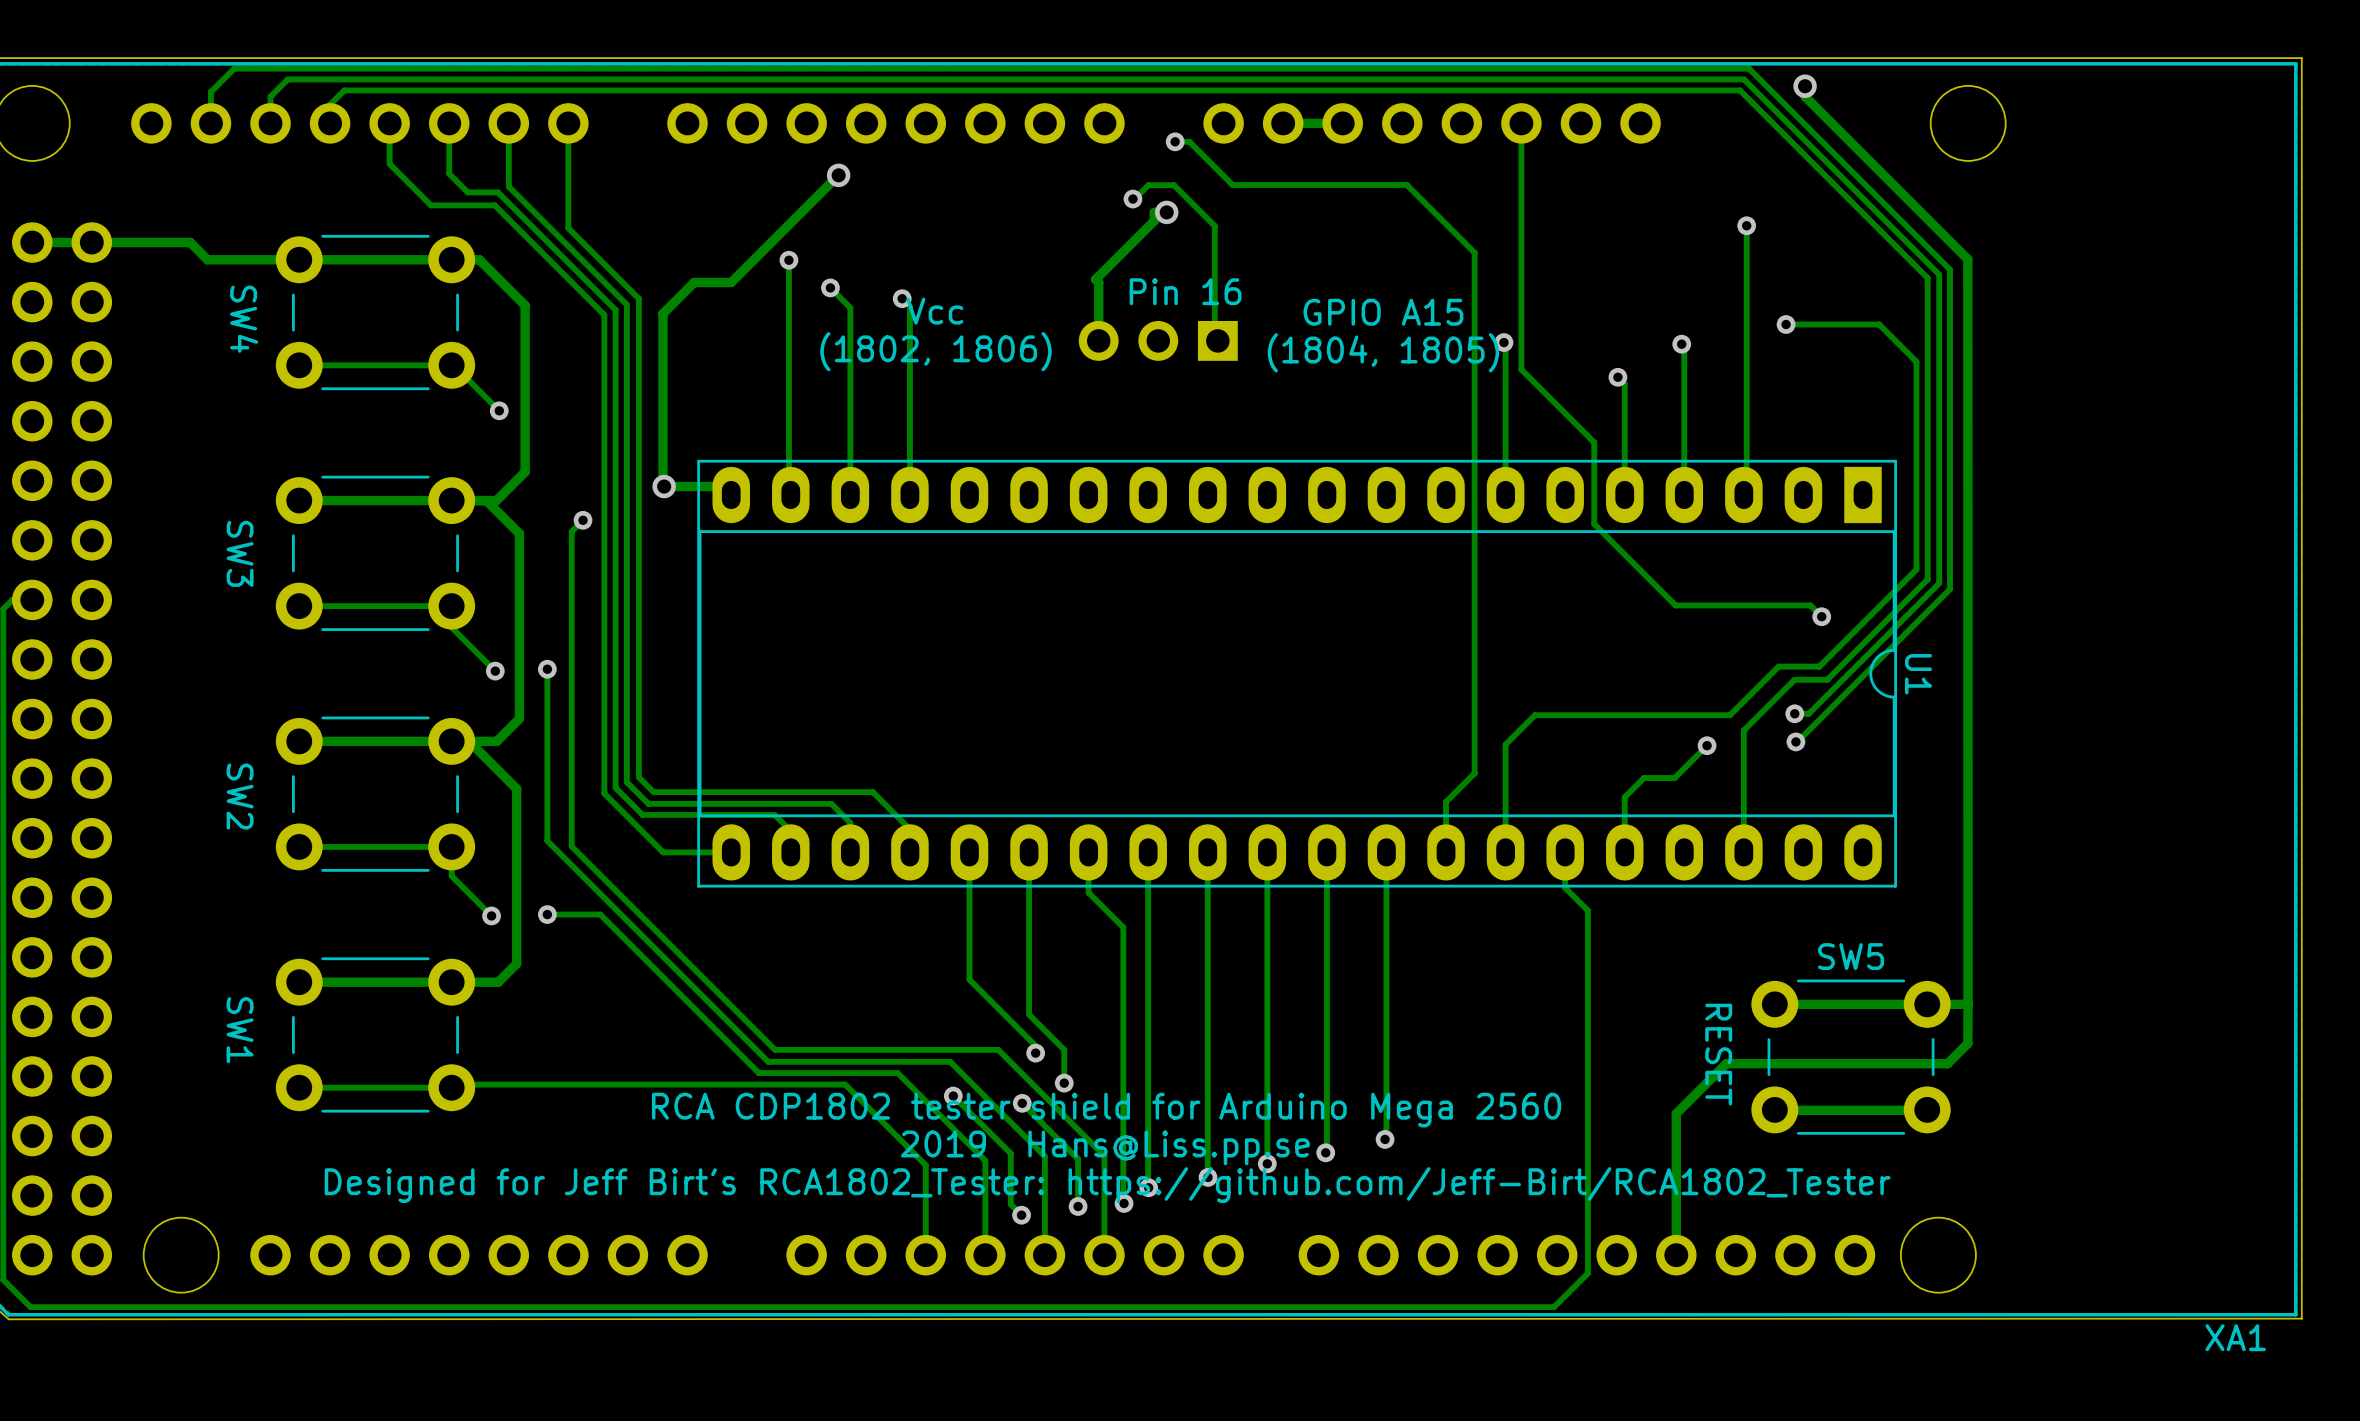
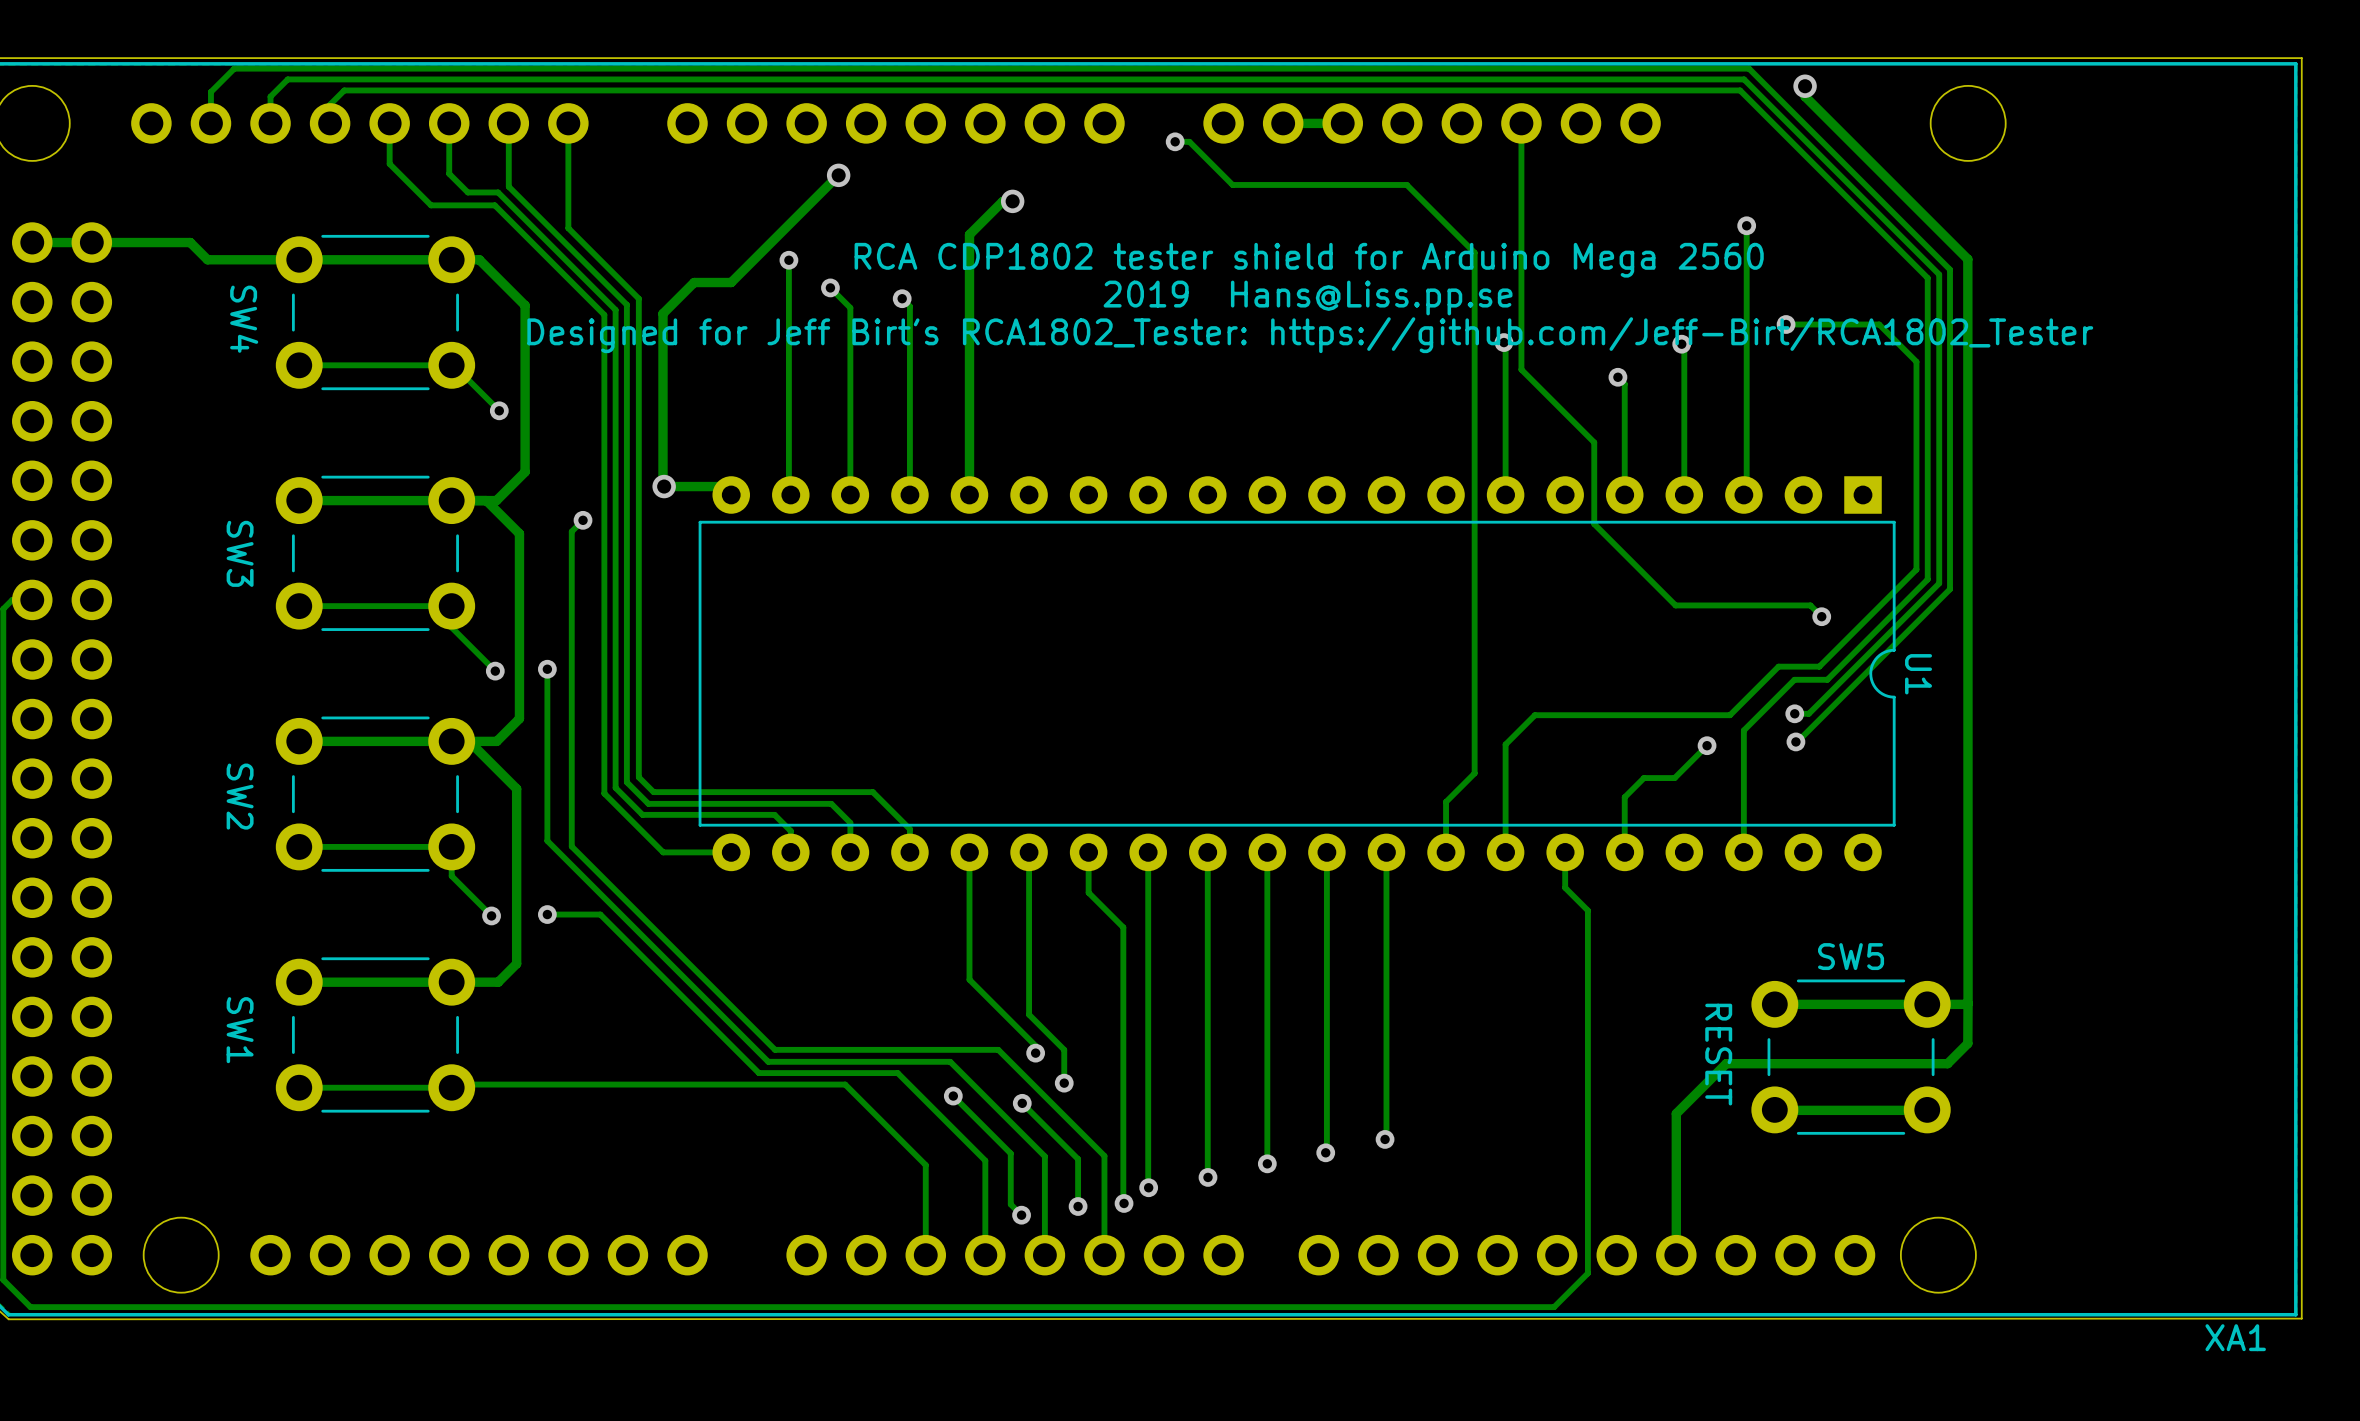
track: (1132, 199) (1148, 185) (1174, 185) (1214, 226) (1214, 337) (1217, 340) -> none
via: (1132, 199) -> none
track: none -> (1012, 201) (1002, 201) (969, 234) (969, 494)
via: none -> (1012, 201)
track: (1166, 212) (1154, 212) (1154, 220) (1095, 279) (1098, 282) (1098, 340) -> none
via: (1166, 212) -> none
text: none -> RCA CDP1802 tester shield for Arduino Mega 2560 (1309, 260)
text: Pin 16 (1185, 291) -> none
text: none -> 2019 Hans@Liss.pp.se (1308, 297)
text: Vcc (934, 311) -> none
text: GPIO A15 (1383, 312) -> none
text: none -> Designed for Jeff Birt's RCA1802_Tester: https://github.com/Jeff-Birt/RCA1802_Tester (1310, 335)
part: (1158, 340) -> none
text: (1802, 1806) (935, 351) -> none
text: (1804, 1805) (1383, 352) -> none
U1 footprint: [697, 459, 1898, 888] -> [698, 476, 1896, 872]
text: RCA CDP1802 tester shield for Arduino Mega 2560 (1106, 1110) -> none
text: 2019 Hans@Liss.pp.se (1105, 1147) -> none
text: Designed for Jeff Birt's RCA1802_Tester: https://github.com/Jeff-Birt/RCA1802_Tester (1107, 1185) -> none

